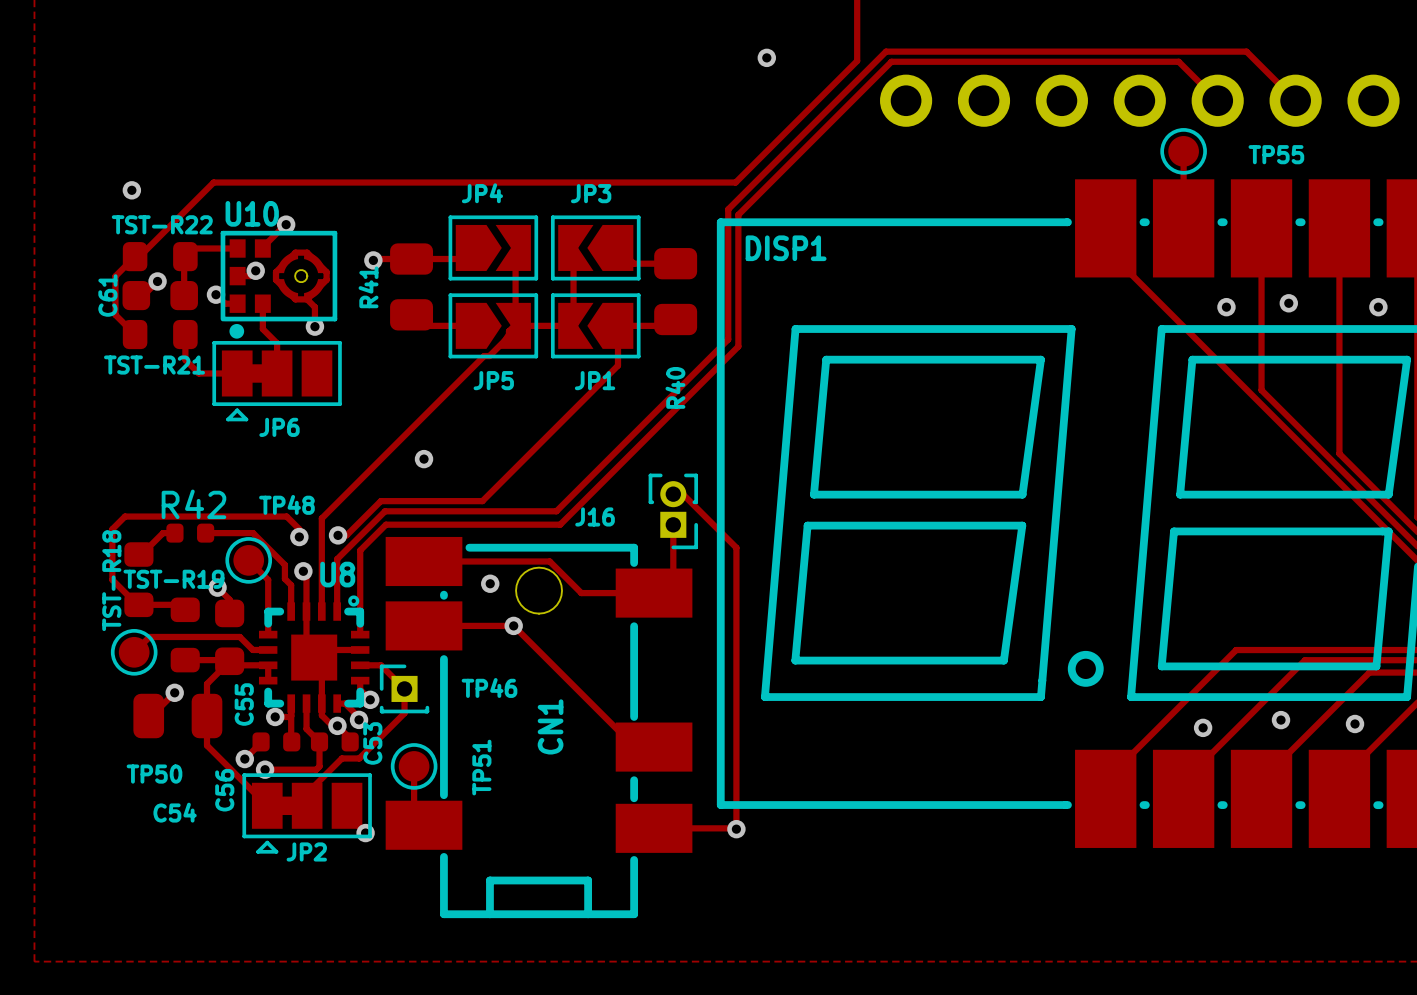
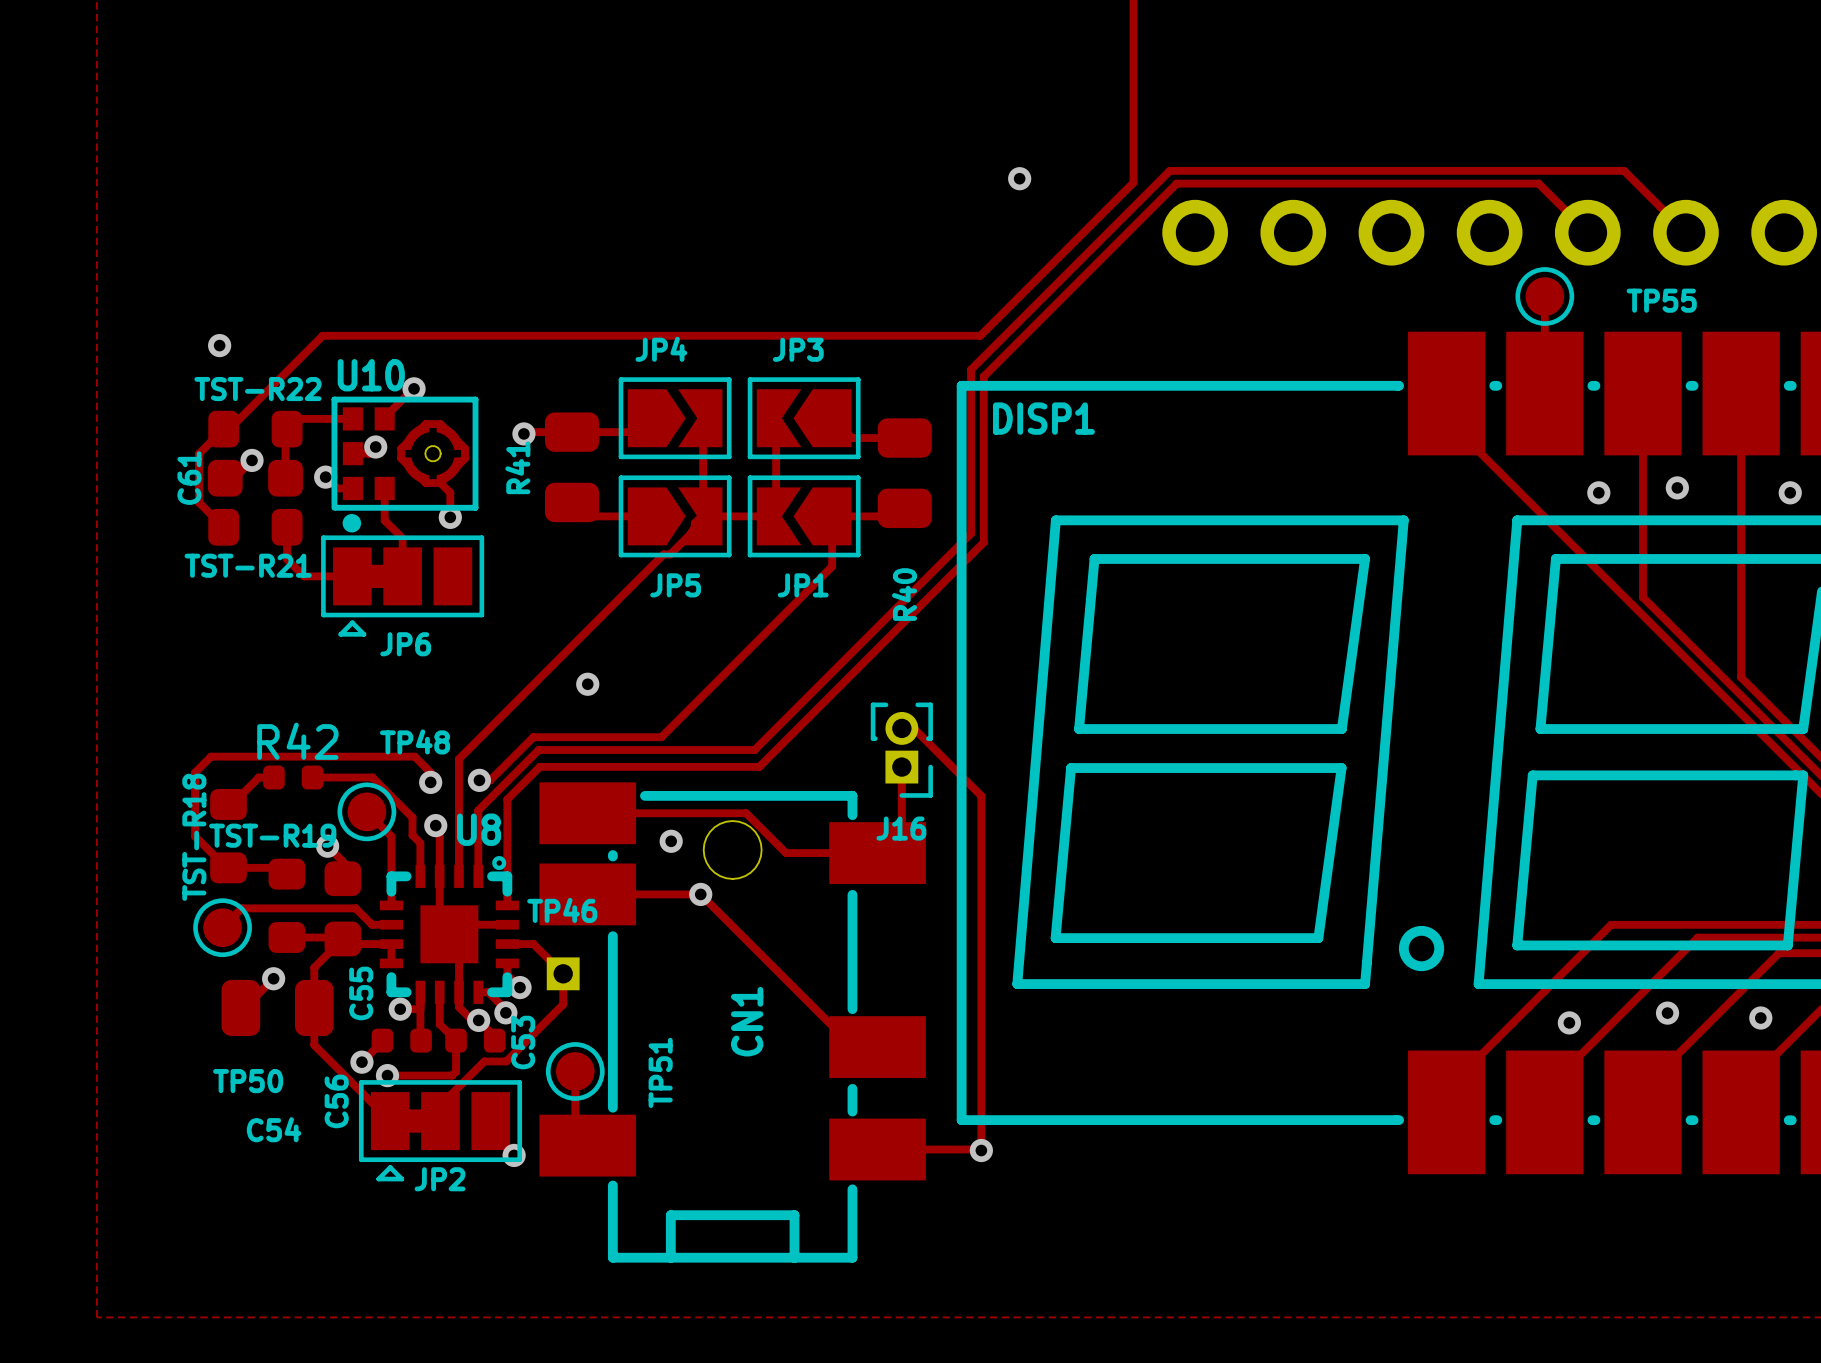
J16 name position: J16 (595, 516) -> J16 (901, 828)
TP46 footprint: [379, 664, 430, 714] -> [546, 957, 580, 991]
TP46 name position: TP46 (489, 687) -> TP46 (562, 910)

